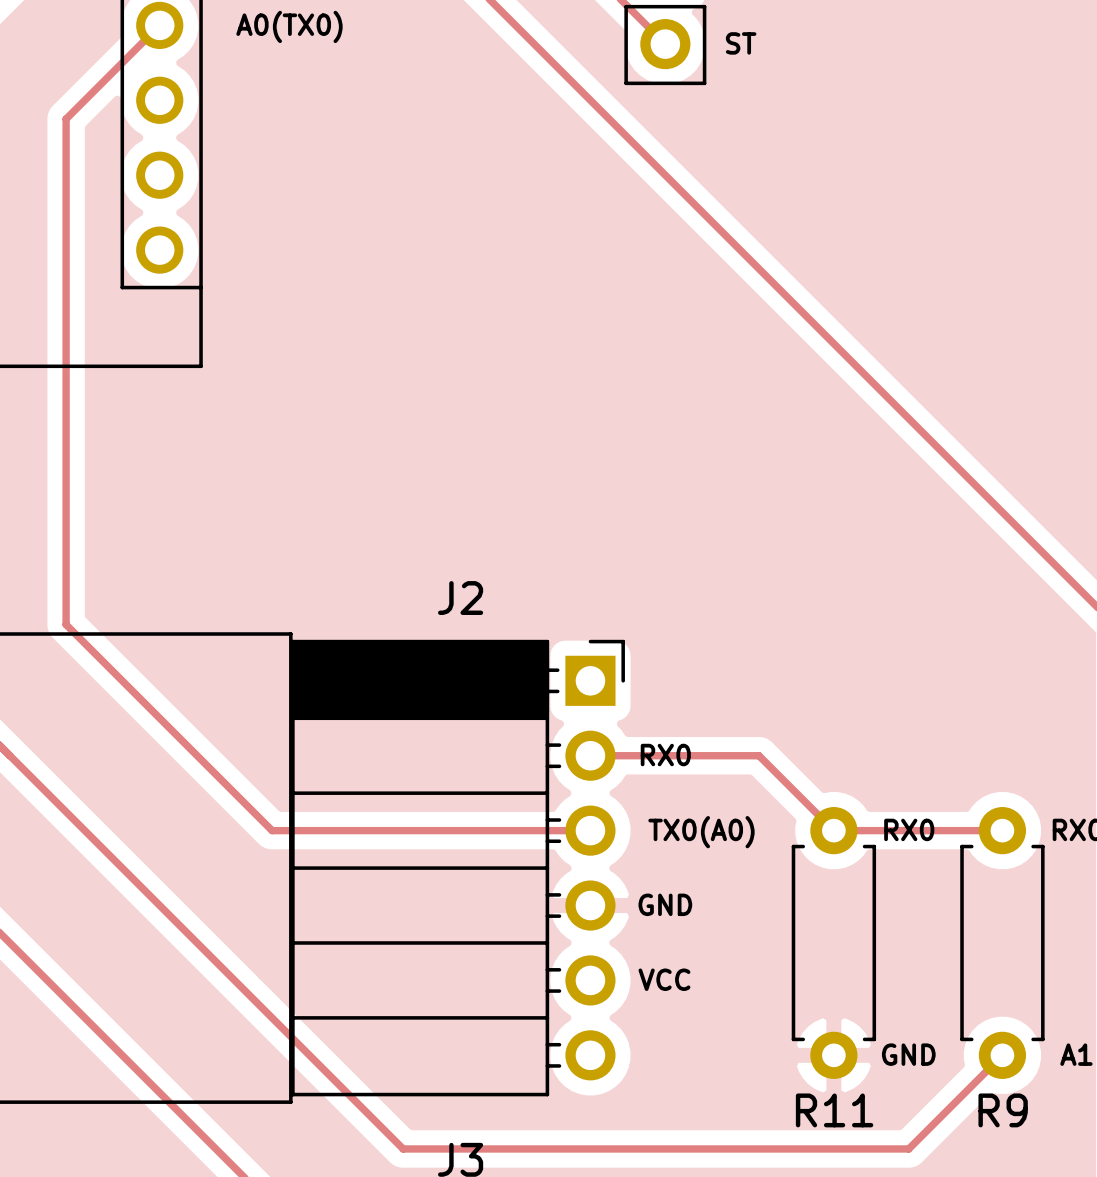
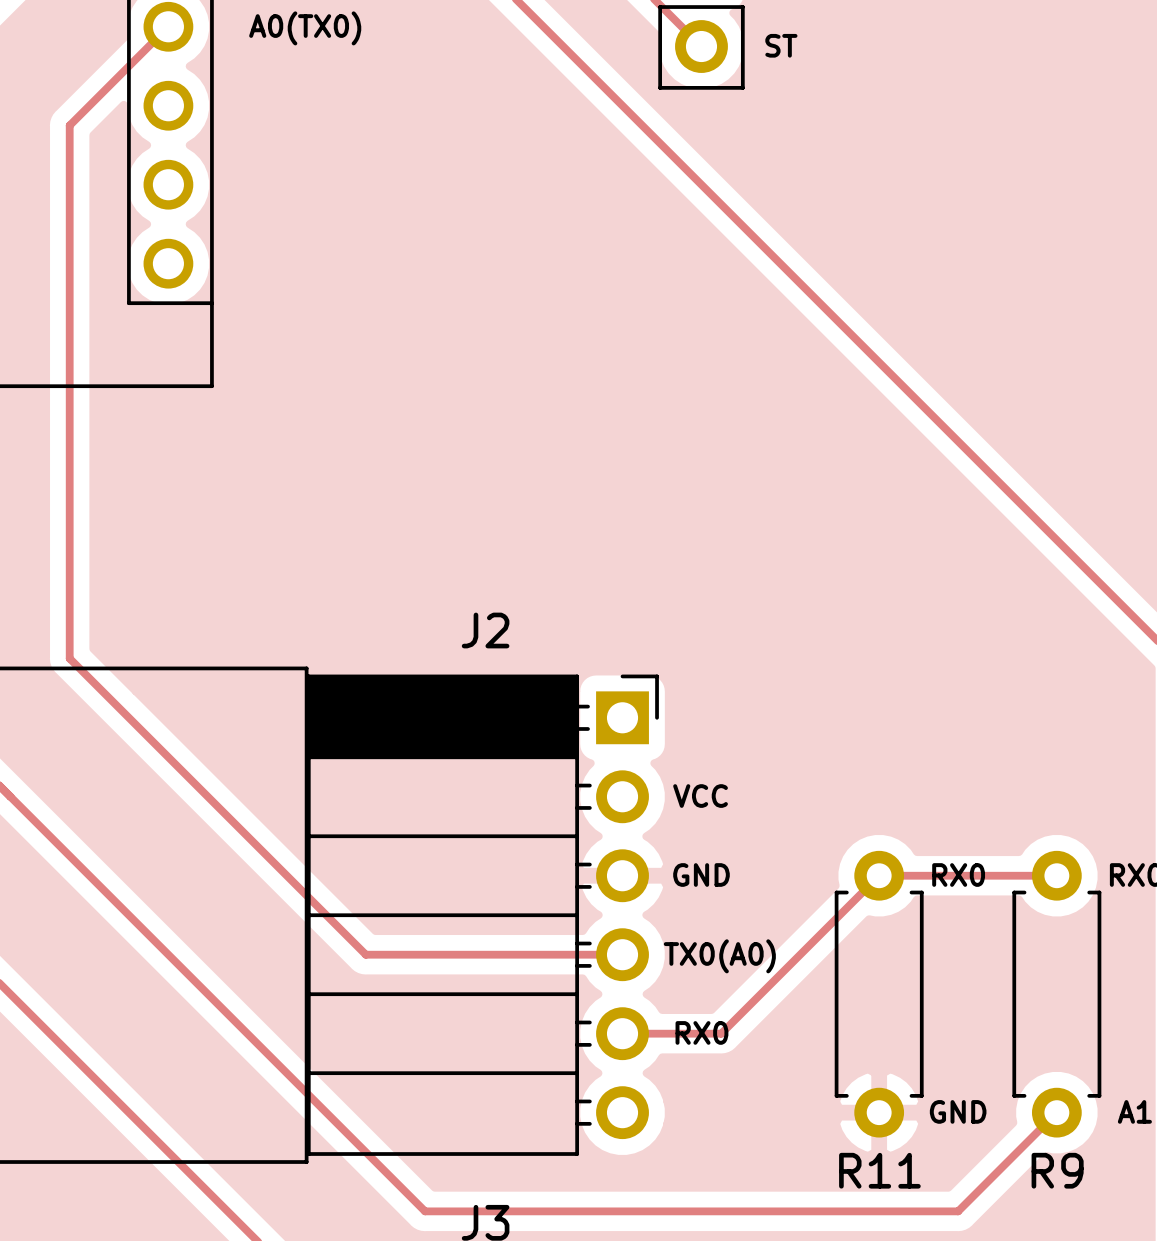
track: (590, 755) (758, 755) (833, 830) -> (622, 1033) (721, 1033) (879, 875)
text: RX0 (665, 755) -> VCC (700, 796)
track: (272, 830) (590, 830) -> (286, 875) (365, 954) (622, 954)
text position: TX0(A0) (701, 832) -> TX0(A0) (719, 956)
text position: GND (665, 904) -> GND (701, 875)
text: VCC (664, 979) -> RX0 (701, 1032)

